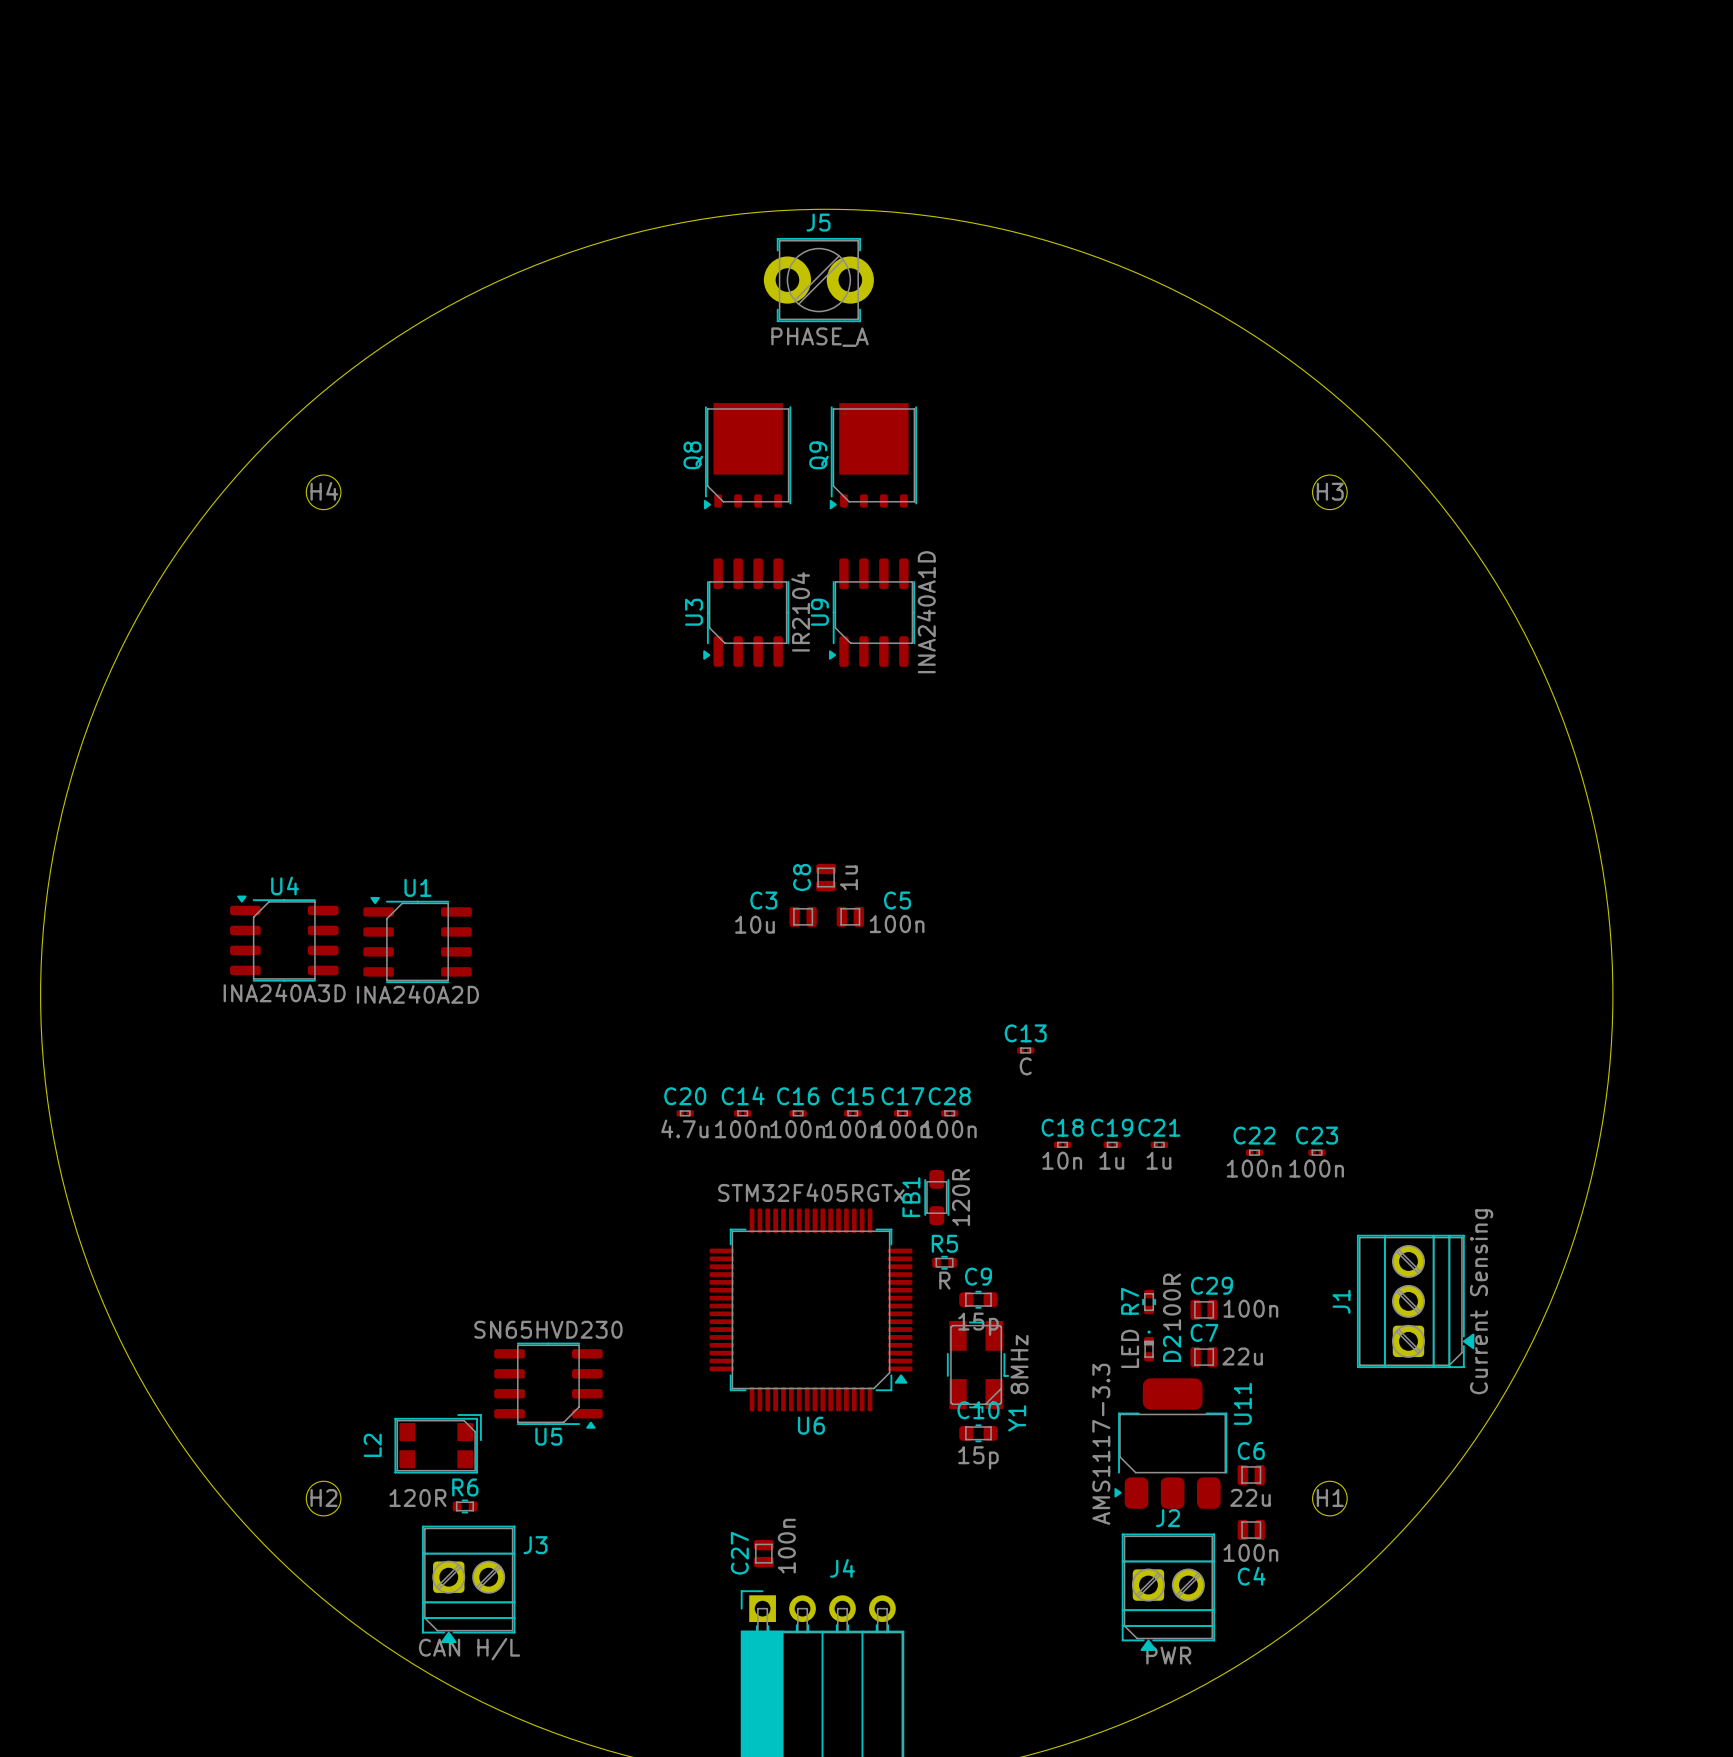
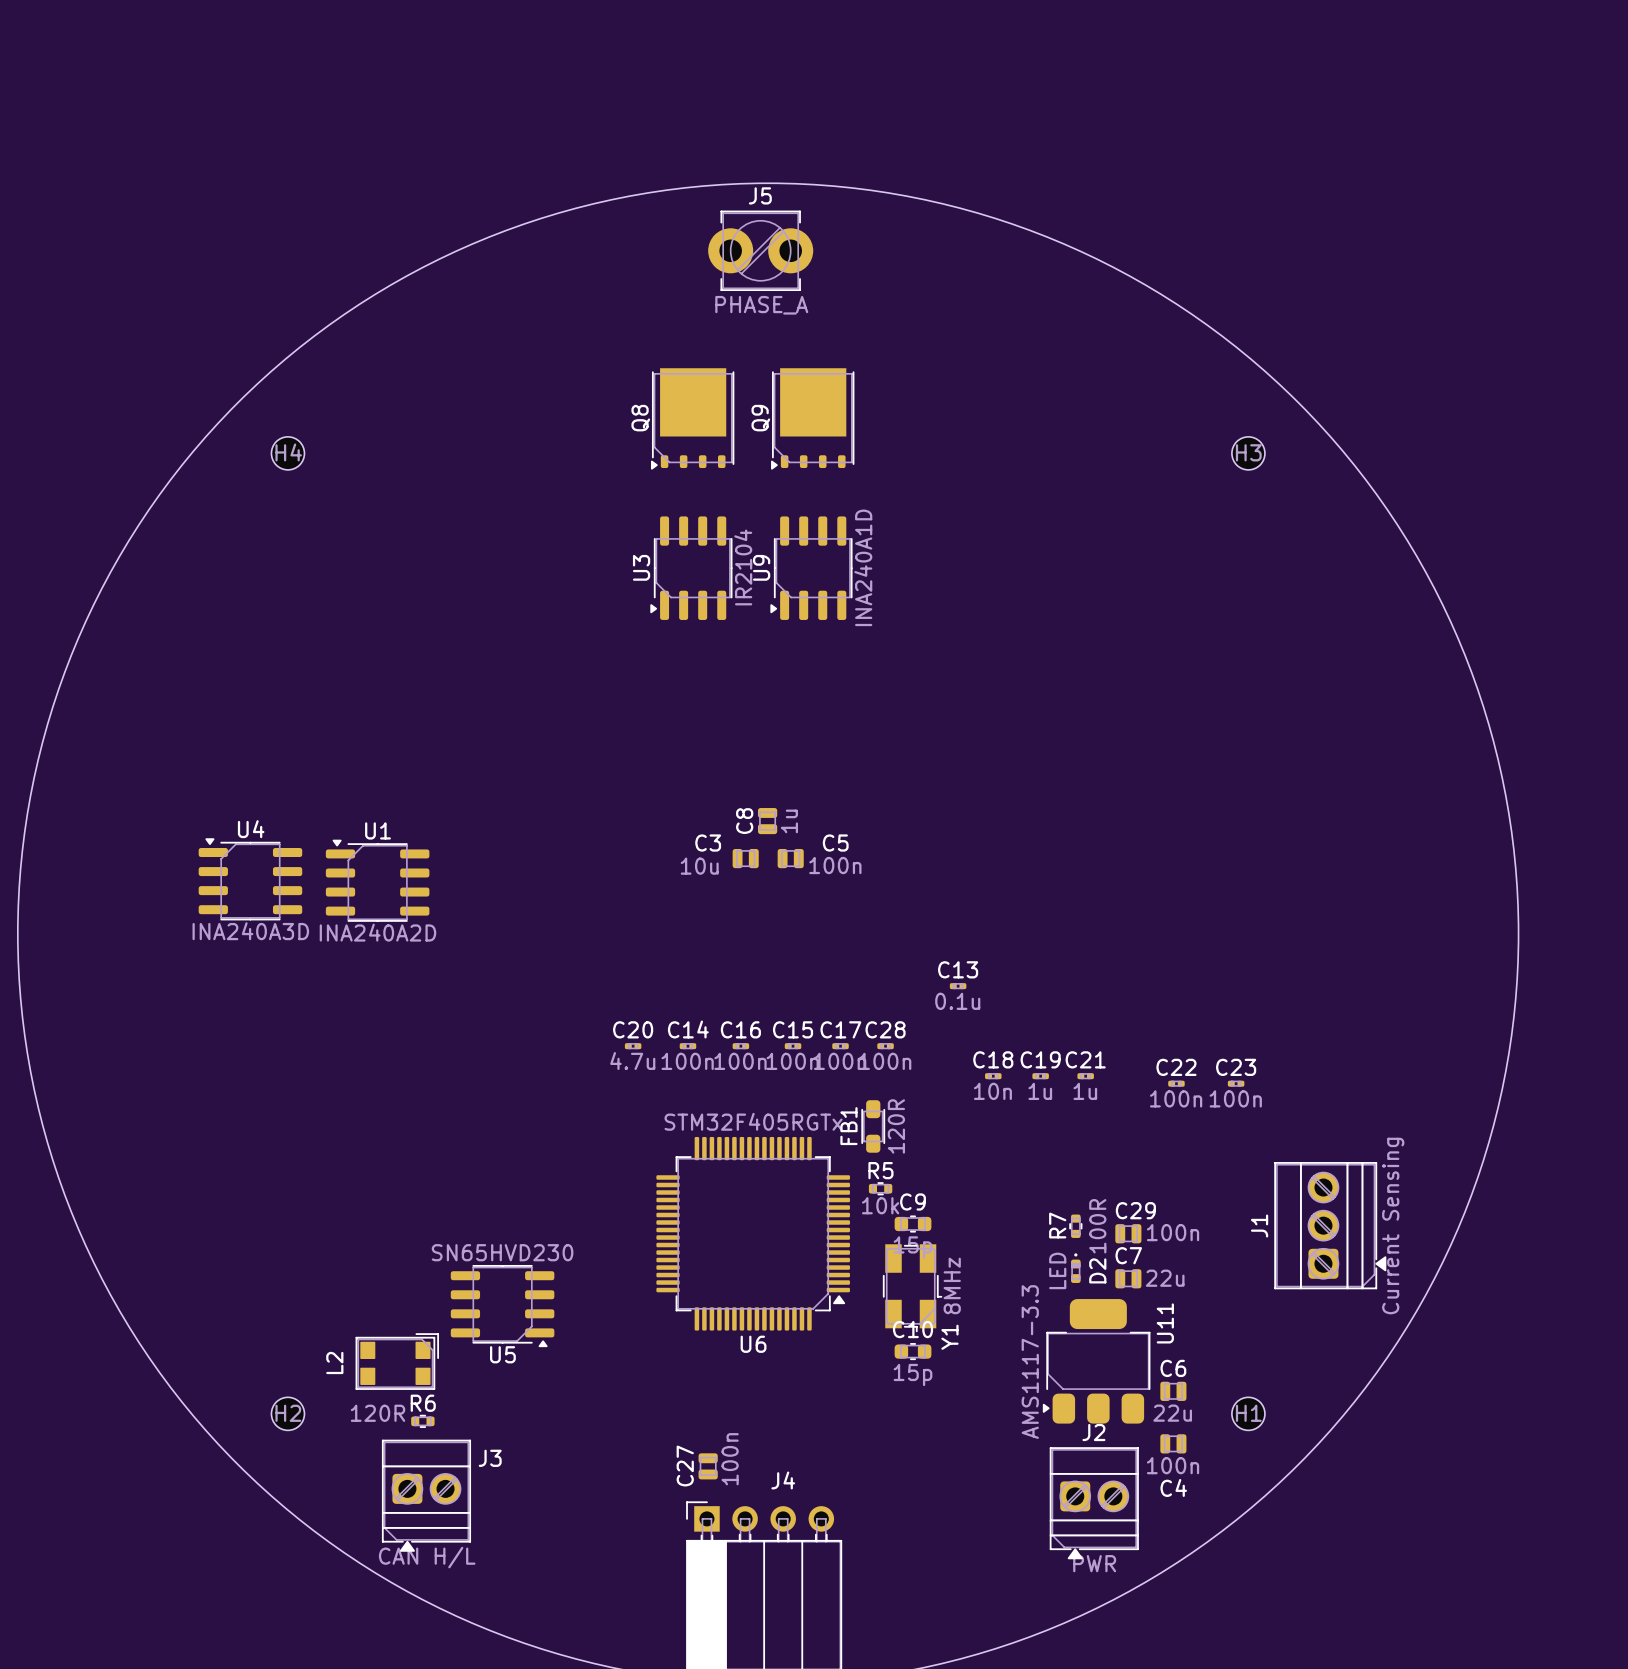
C13 value: C (1025, 1066) -> 0.1u (957, 1001)
R5 value: R (944, 1280) -> 10k (880, 1205)

